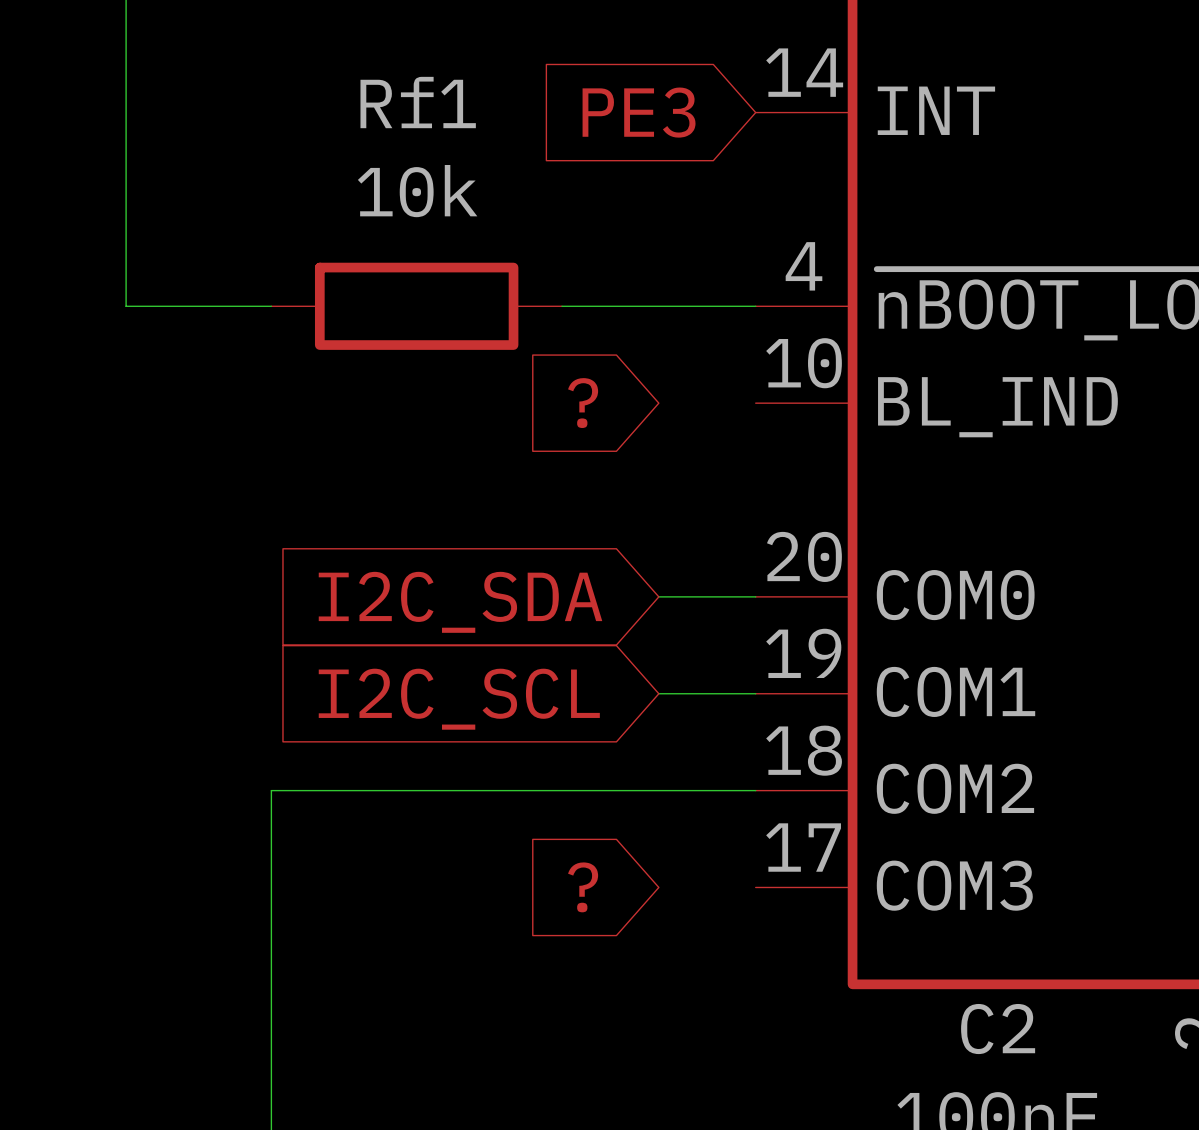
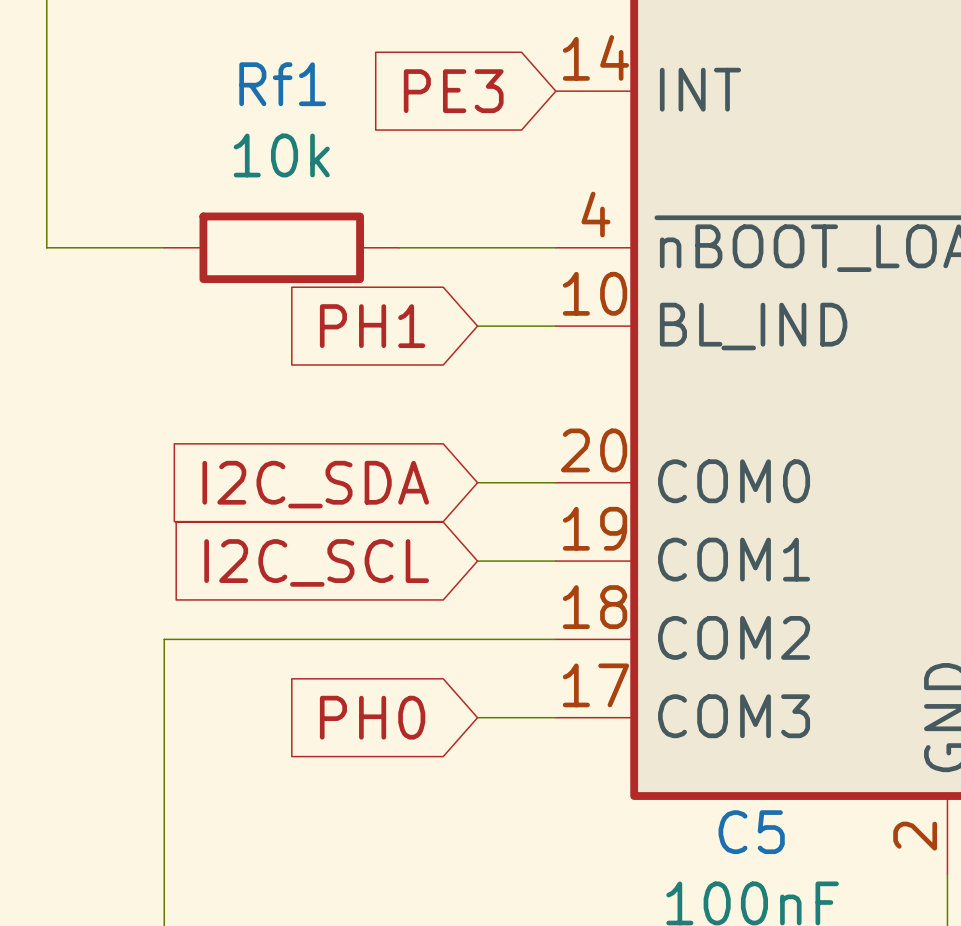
global label: ? (583, 403) -> PH1 (372, 326)
wire: none -> (477, 326) (555, 326)
global label: ? (583, 887) -> PH0 (372, 717)
wire: none -> (477, 717) (555, 717)
C2 name: C2 (998, 1029) -> C5 (751, 832)

